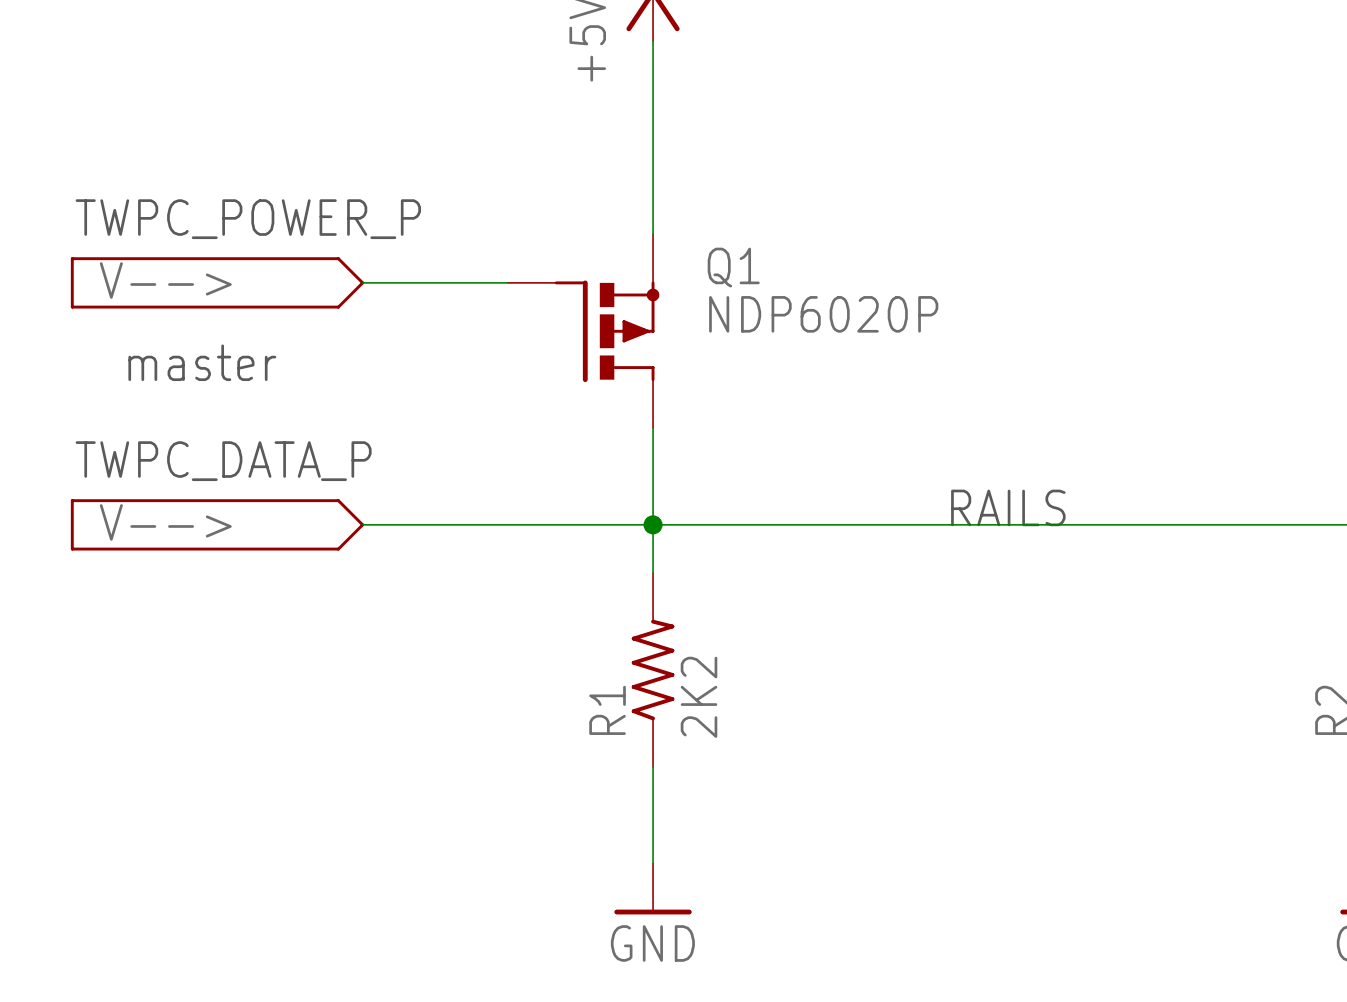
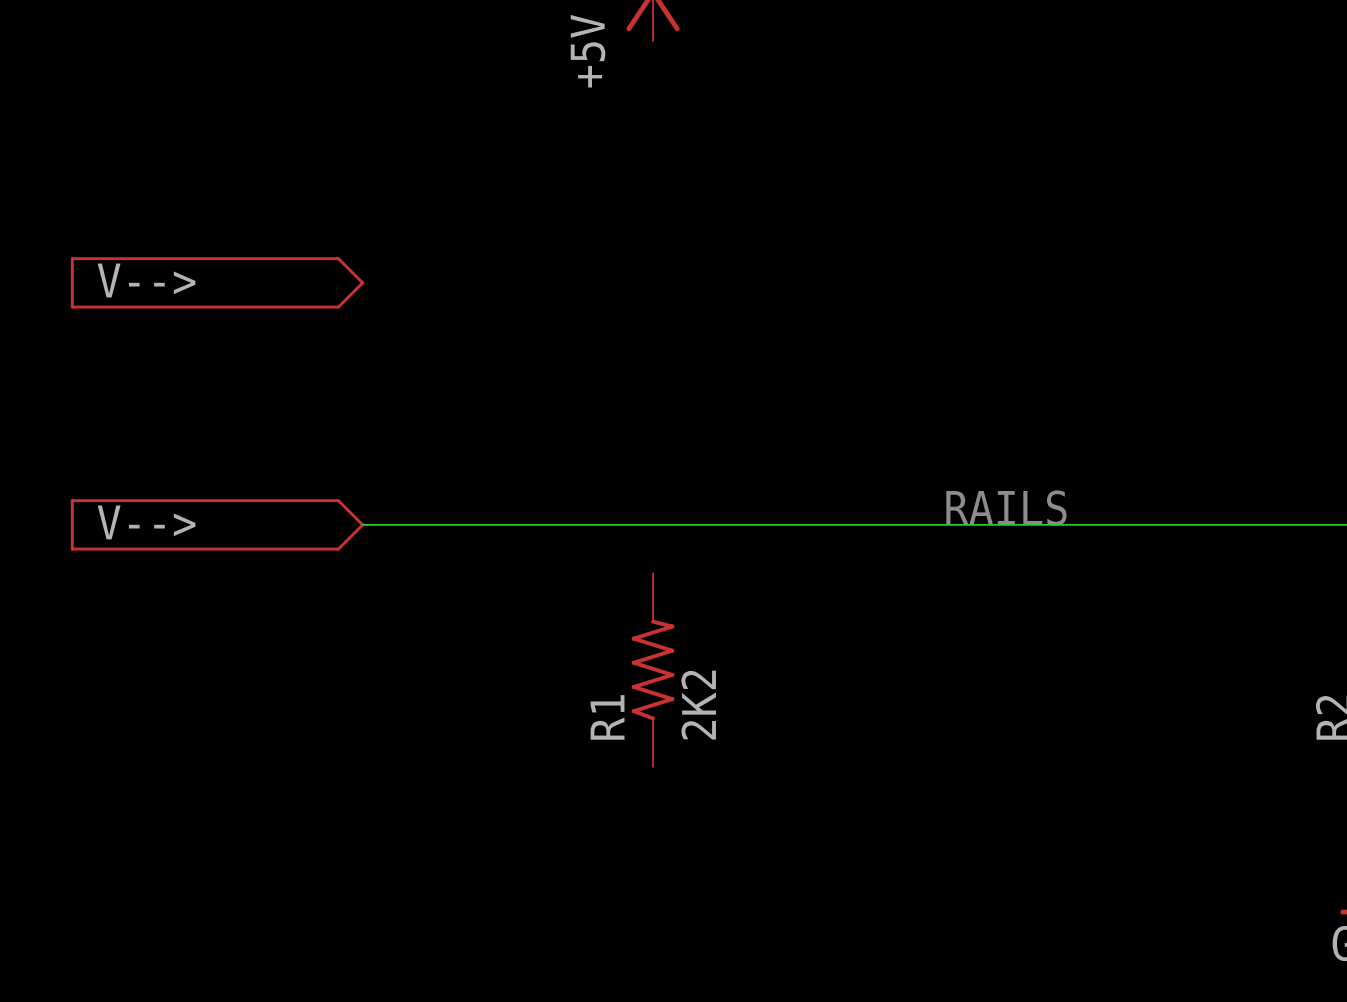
wire: (653, 40) (653, 234) -> none
text: TWPC_POWER_P (248, 219) -> none
wire: (362, 282) (507, 282) -> none
Q1: NDP6020P (583, 331) -> none
text: master (202, 362) -> none
wire: (653, 428) (653, 573) -> none
text: TWPC_DATA_P (223, 461) -> none
junction: (653, 524) -> none
wire: (653, 766) (653, 863) -> none
power symbol: GND (653, 889) -> none

